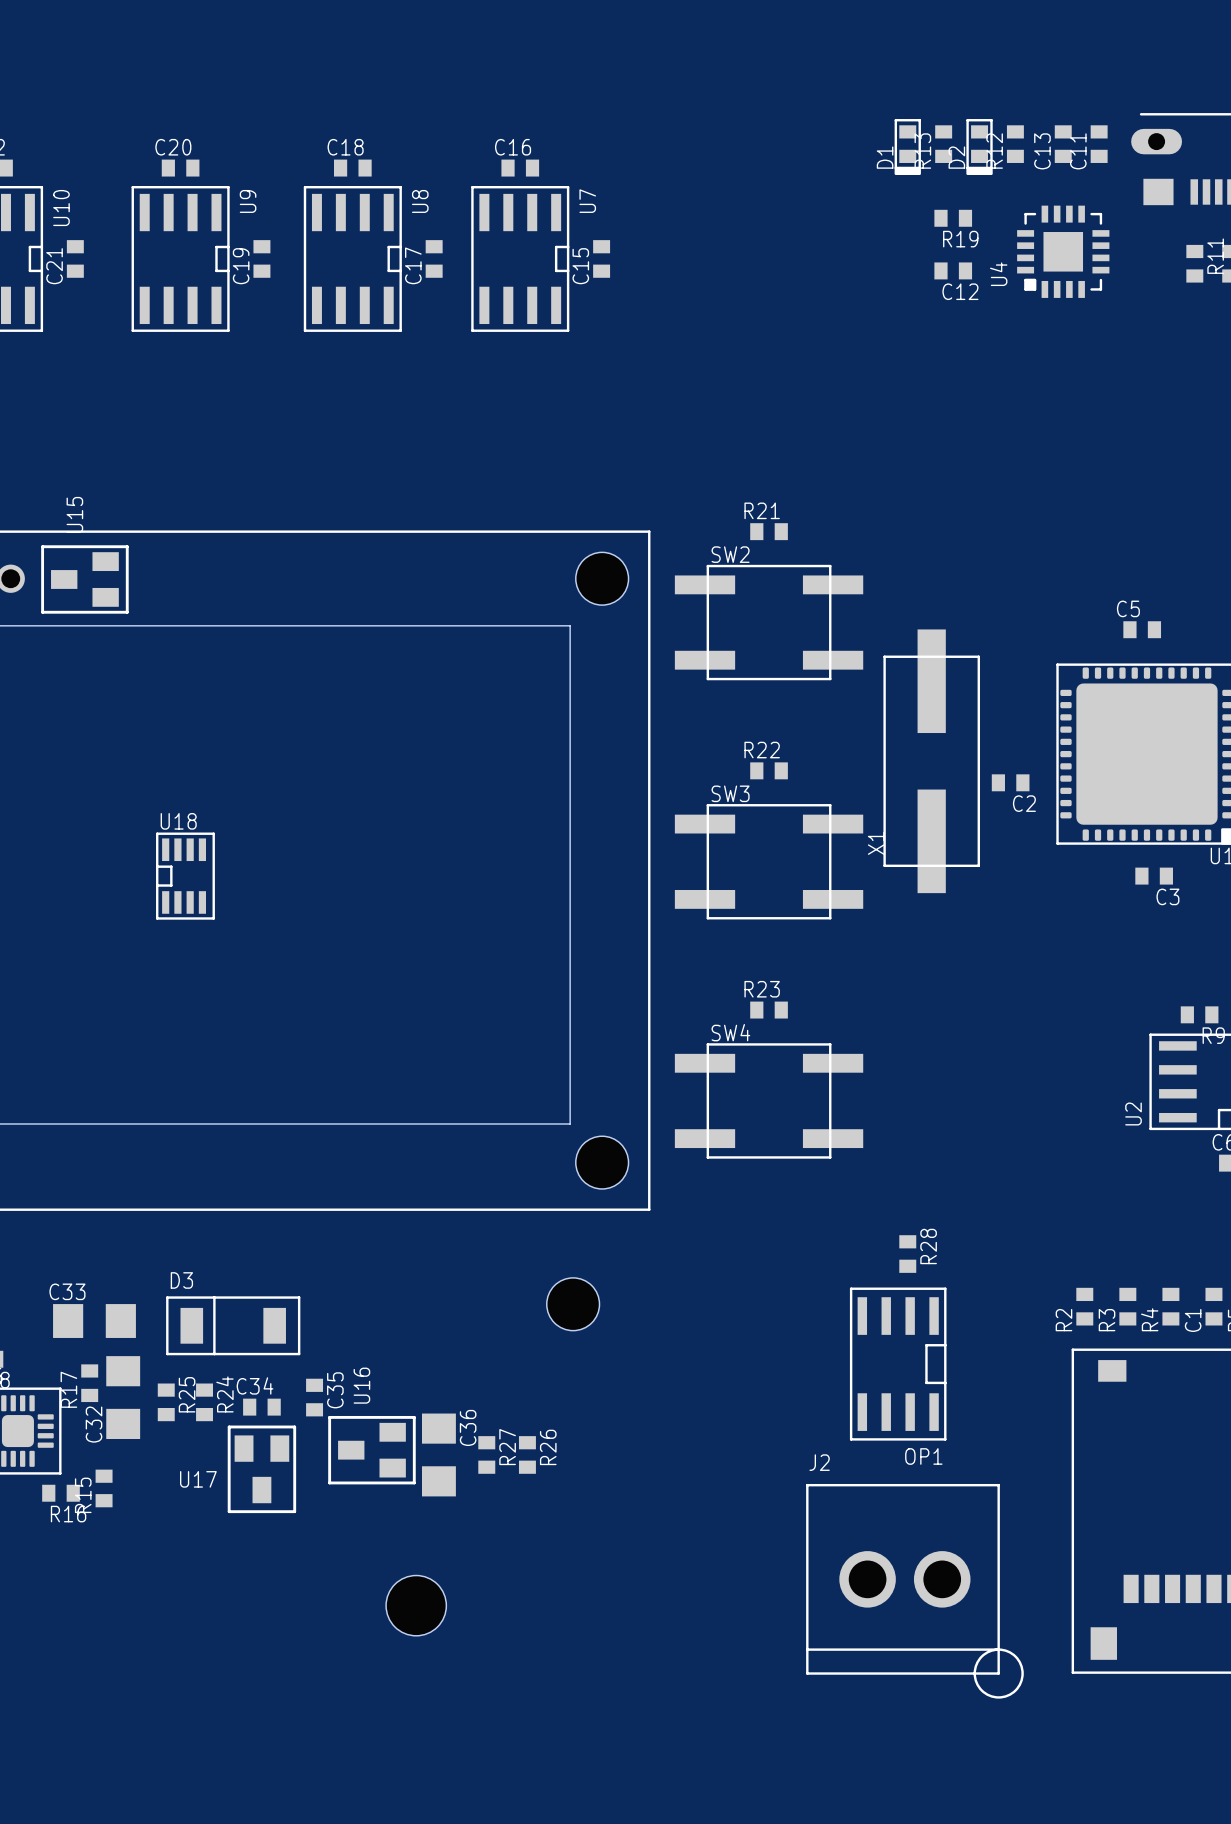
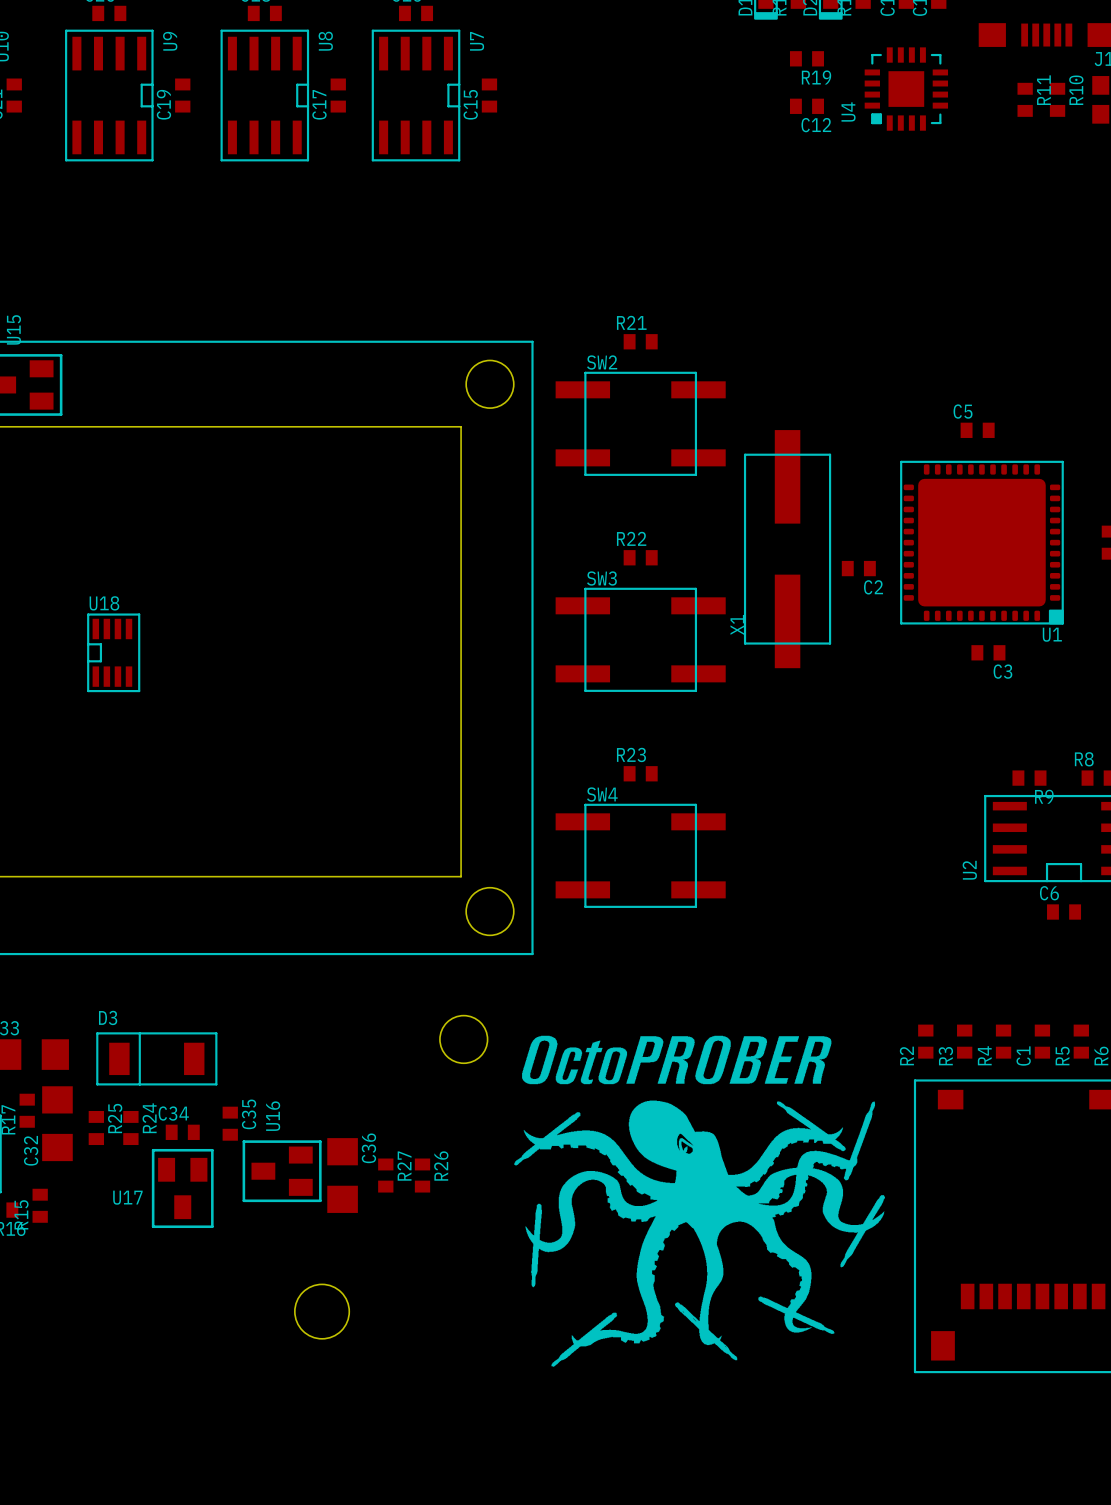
R28: (907, 1254) -> none
drawing: none -> [514, 1035, 885, 1367]
OP1: (898, 1364) -> none
J2: (914, 1591) -> none

